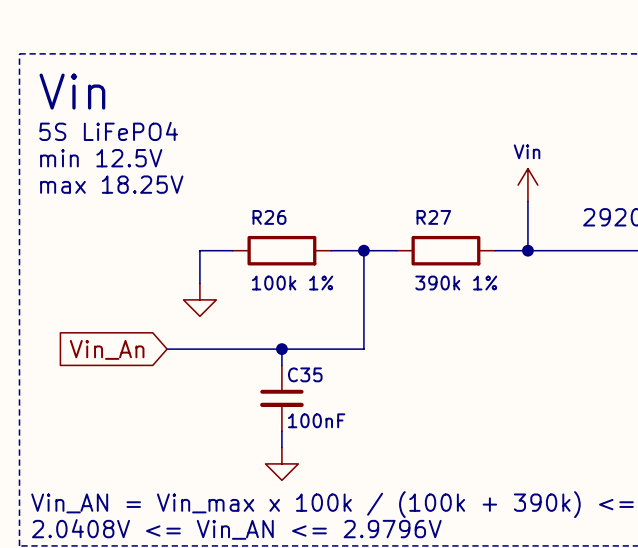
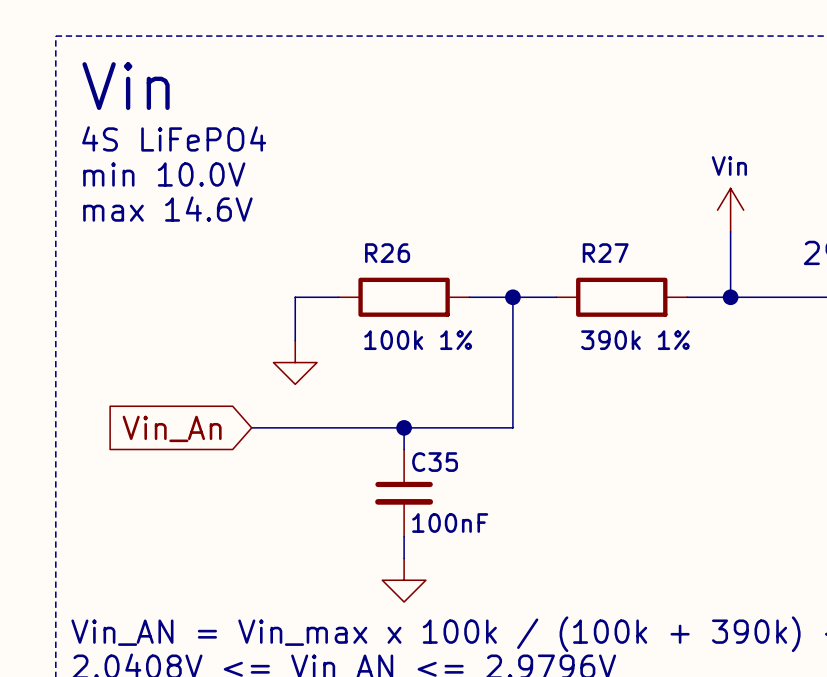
text: 5S LiFePO4 (108, 131) -> 4S LiFePO4 (174, 138)
text: min 12.5V (101, 158) -> min 10.0V (164, 174)
text: max 18.25V (111, 184) -> max 14.6V (167, 209)

